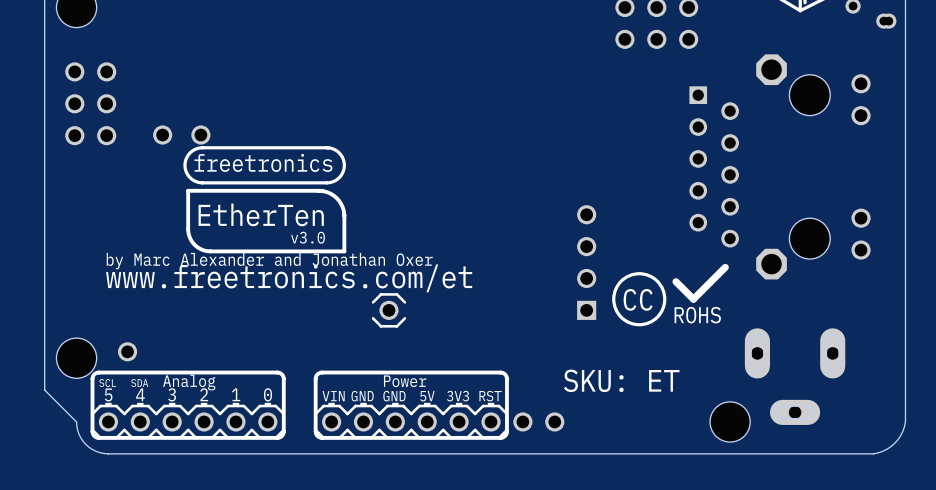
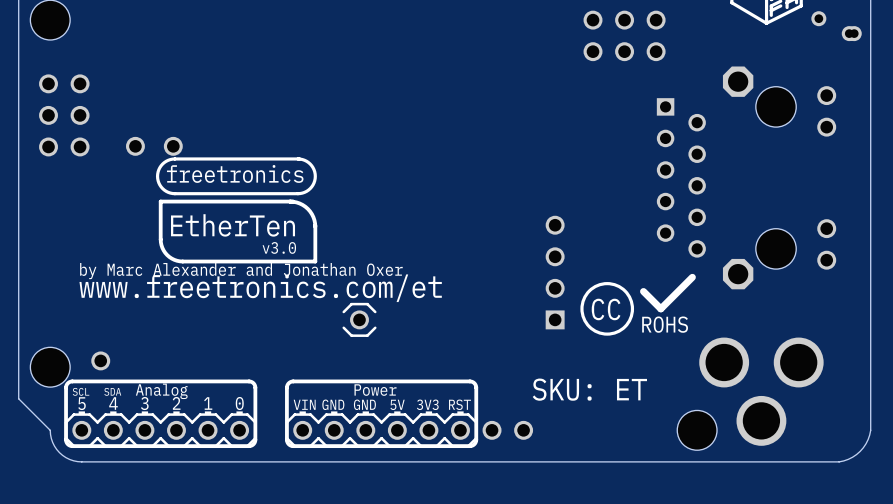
part footprint: [744, 328, 846, 425] -> [699, 337, 824, 446]

